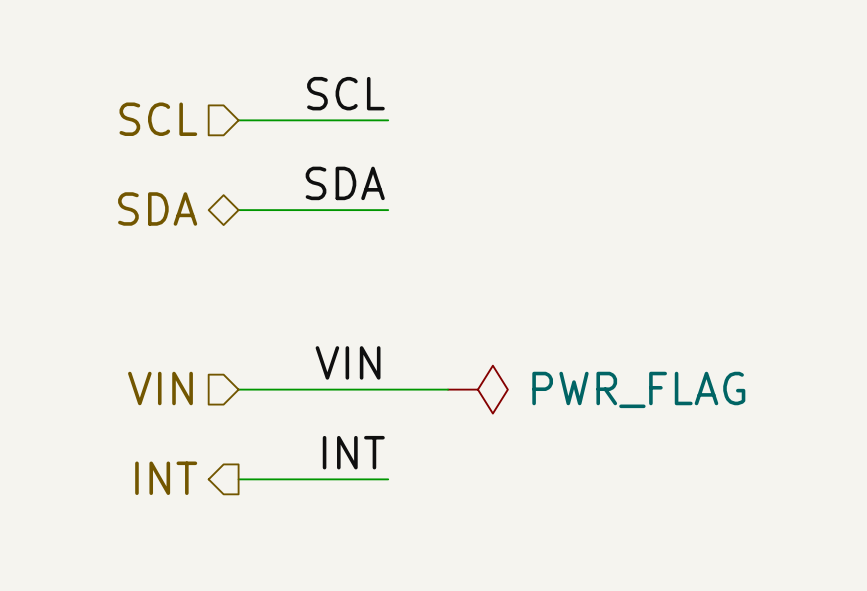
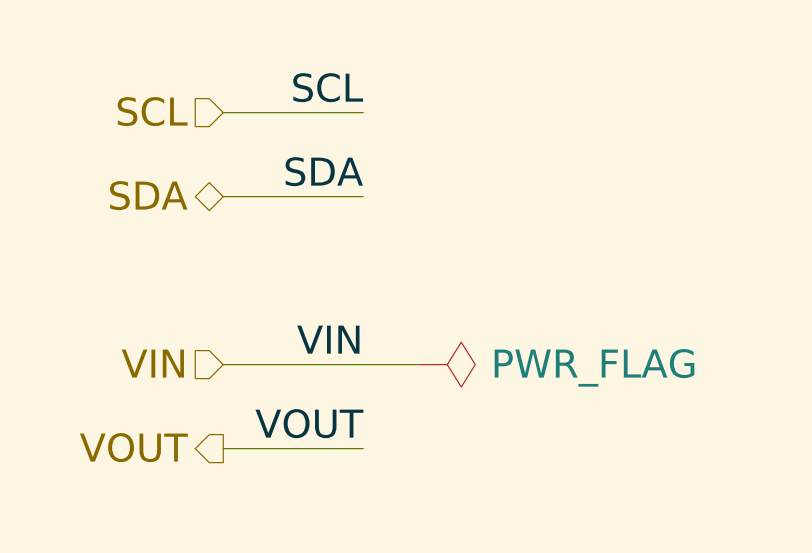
label: INT (353, 452) -> VOUT (309, 423)
hierarchical label: INT (166, 478) -> VOUT (133, 447)

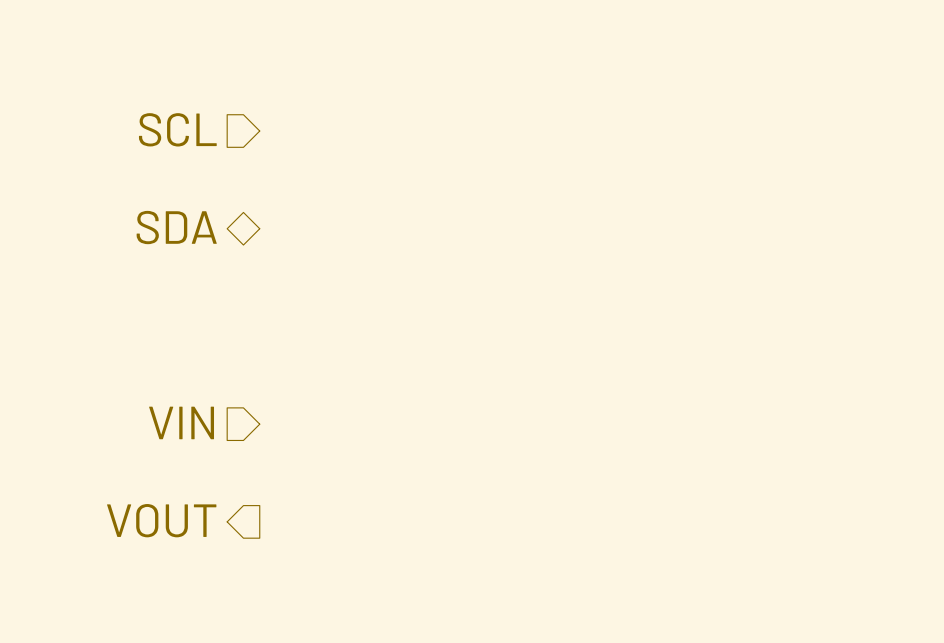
label: SCL (328, 87) -> none
wire: (223, 112) (363, 112) -> none
label: SDA (324, 171) -> none
wire: (223, 196) (363, 196) -> none
label: VIN (328, 339) -> none
wire: (223, 364) (419, 364) -> none
power symbol: PWR_FLAG (447, 364) -> none
label: VOUT (309, 423) -> none
wire: (223, 448) (363, 448) -> none

